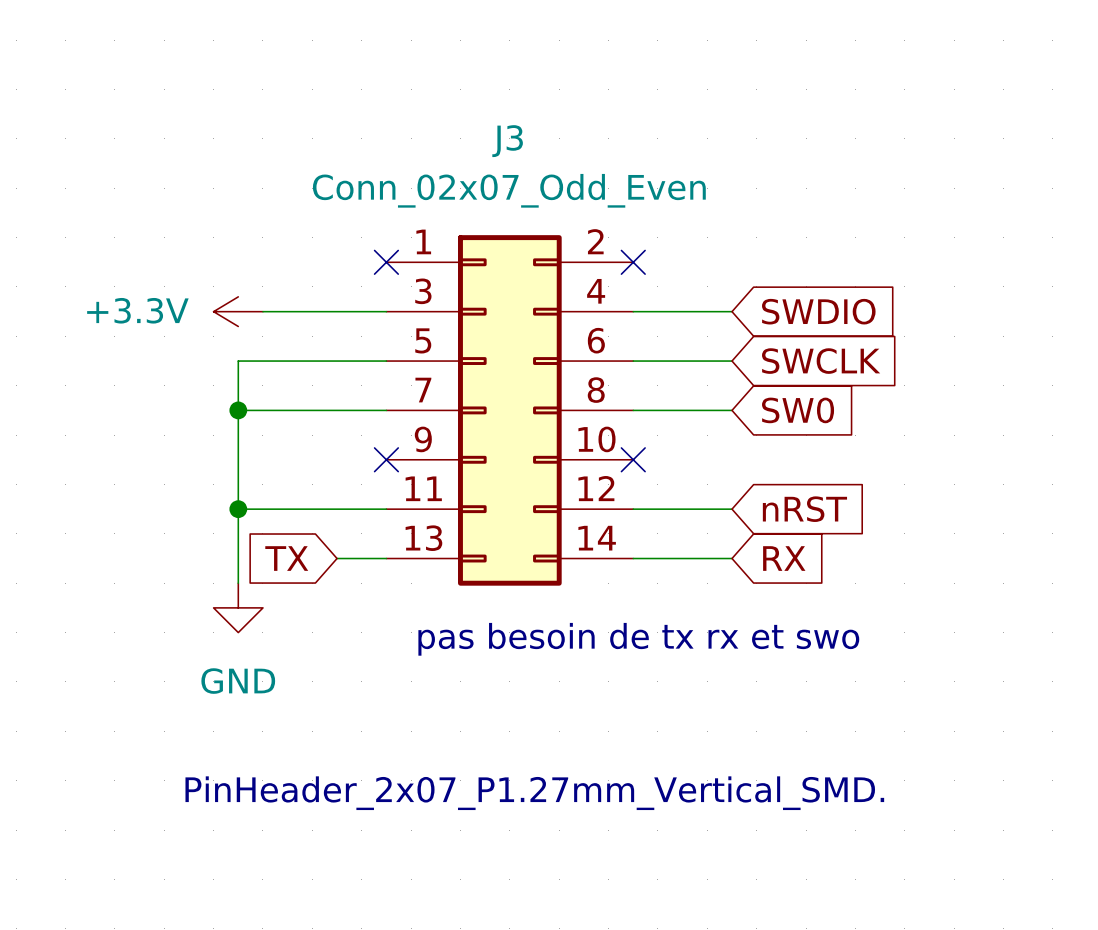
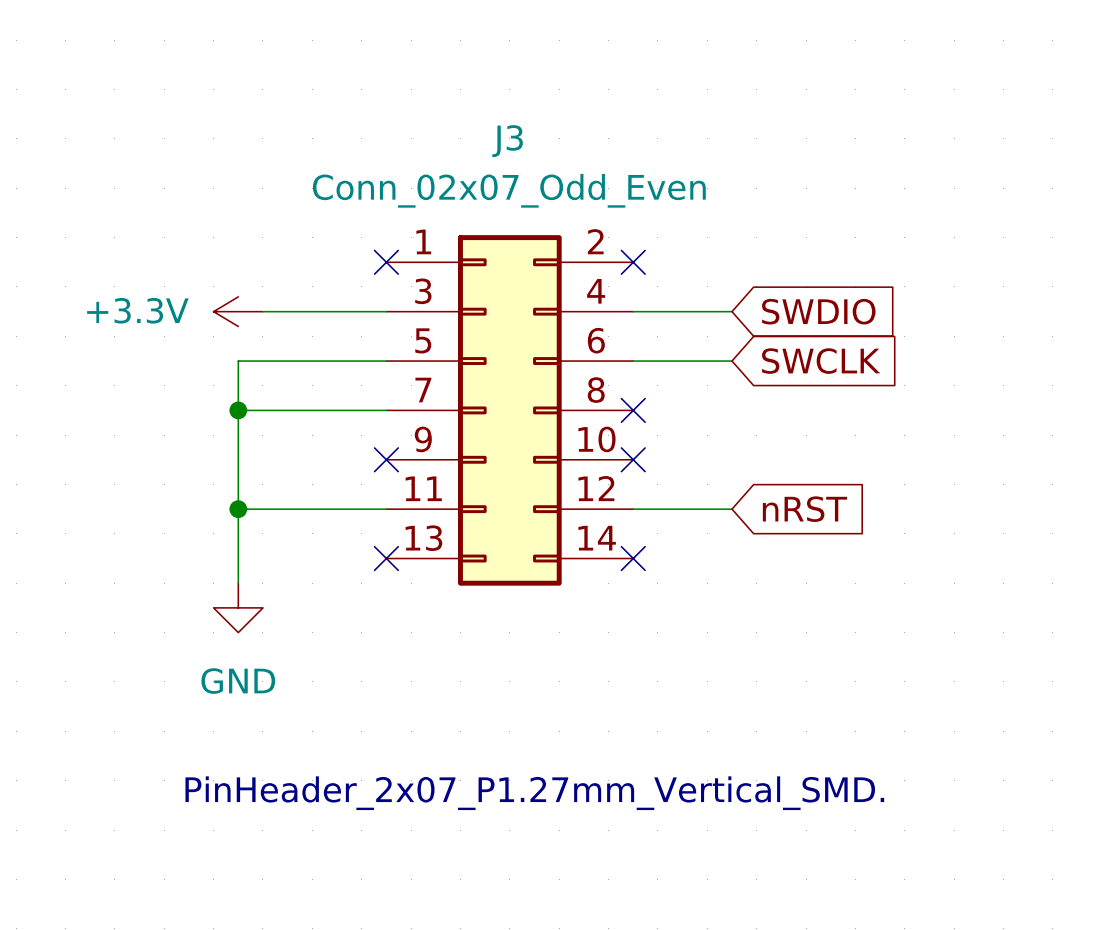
wire: (633, 410) (732, 410) -> none
no-connect mark: none -> (633, 410)
global label: SW0 (798, 410) -> none
global label: TX (286, 558) -> none
wire: (337, 558) (386, 558) -> none
no-connect mark: none -> (386, 558)
wire: (633, 558) (732, 558) -> none
no-connect mark: none -> (633, 558)
global label: RX (784, 558) -> none
text: pas besoin de tx rx et swo (638, 639) -> none

